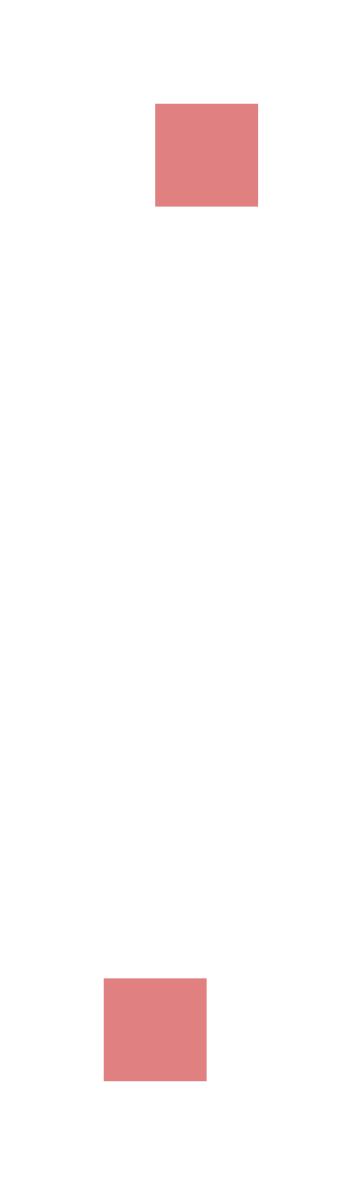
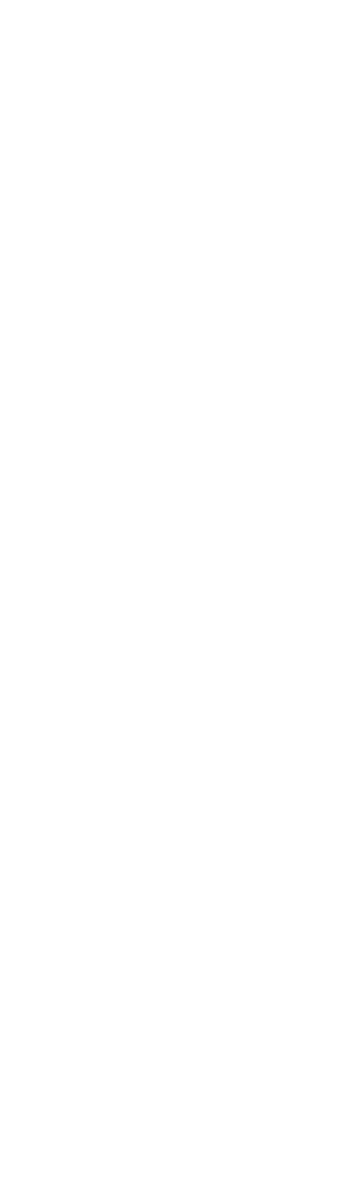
part: (206, 155) -> none
part: (155, 1029) -> none

